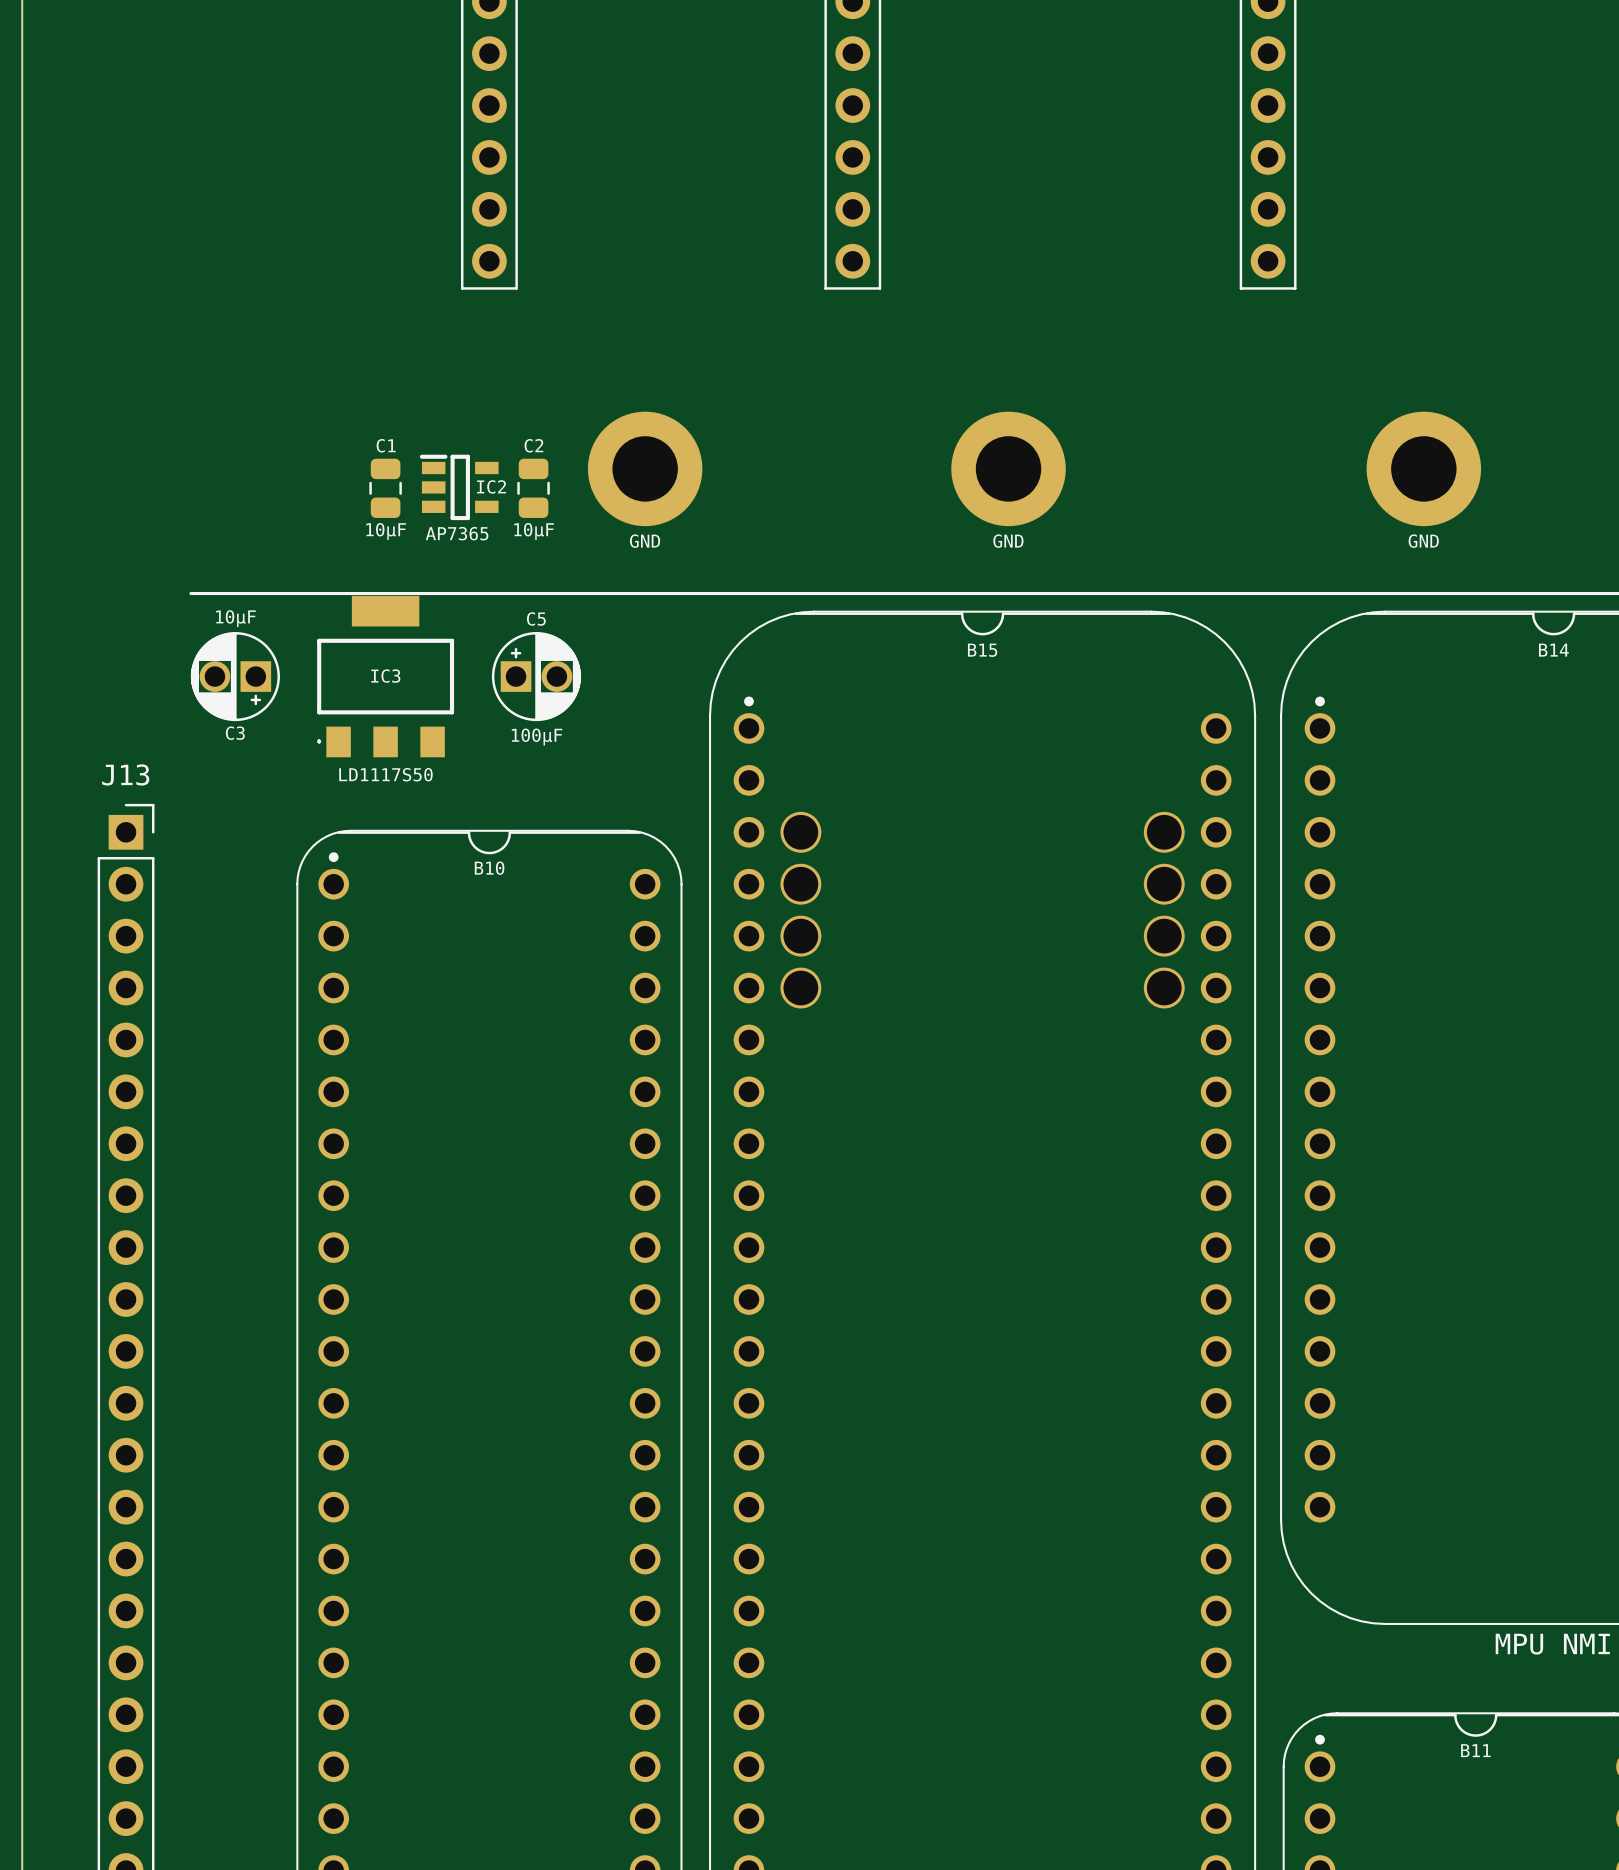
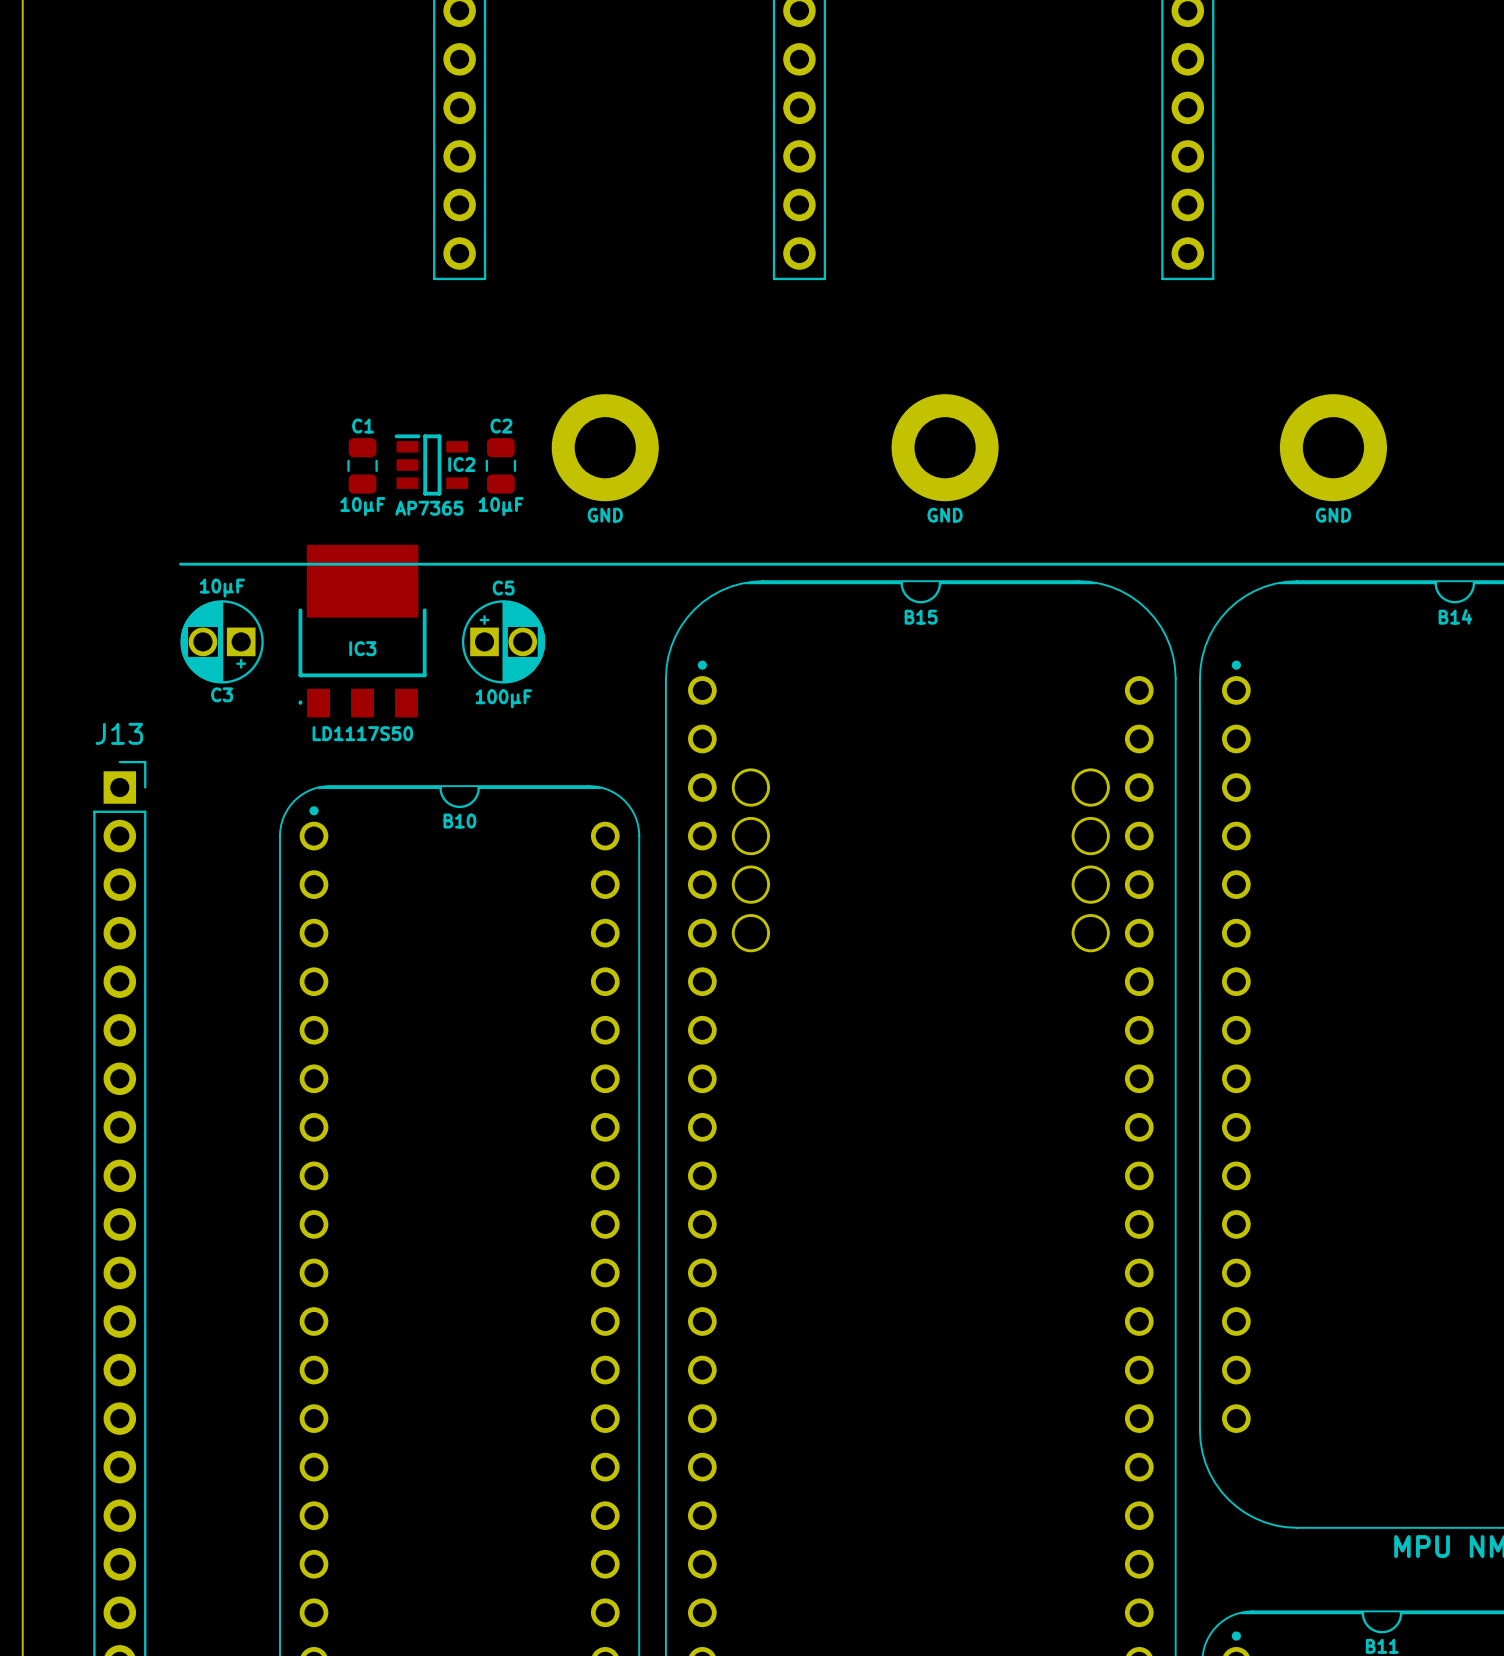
IC3 footprint: [317, 595, 455, 758] -> [298, 544, 427, 718]

